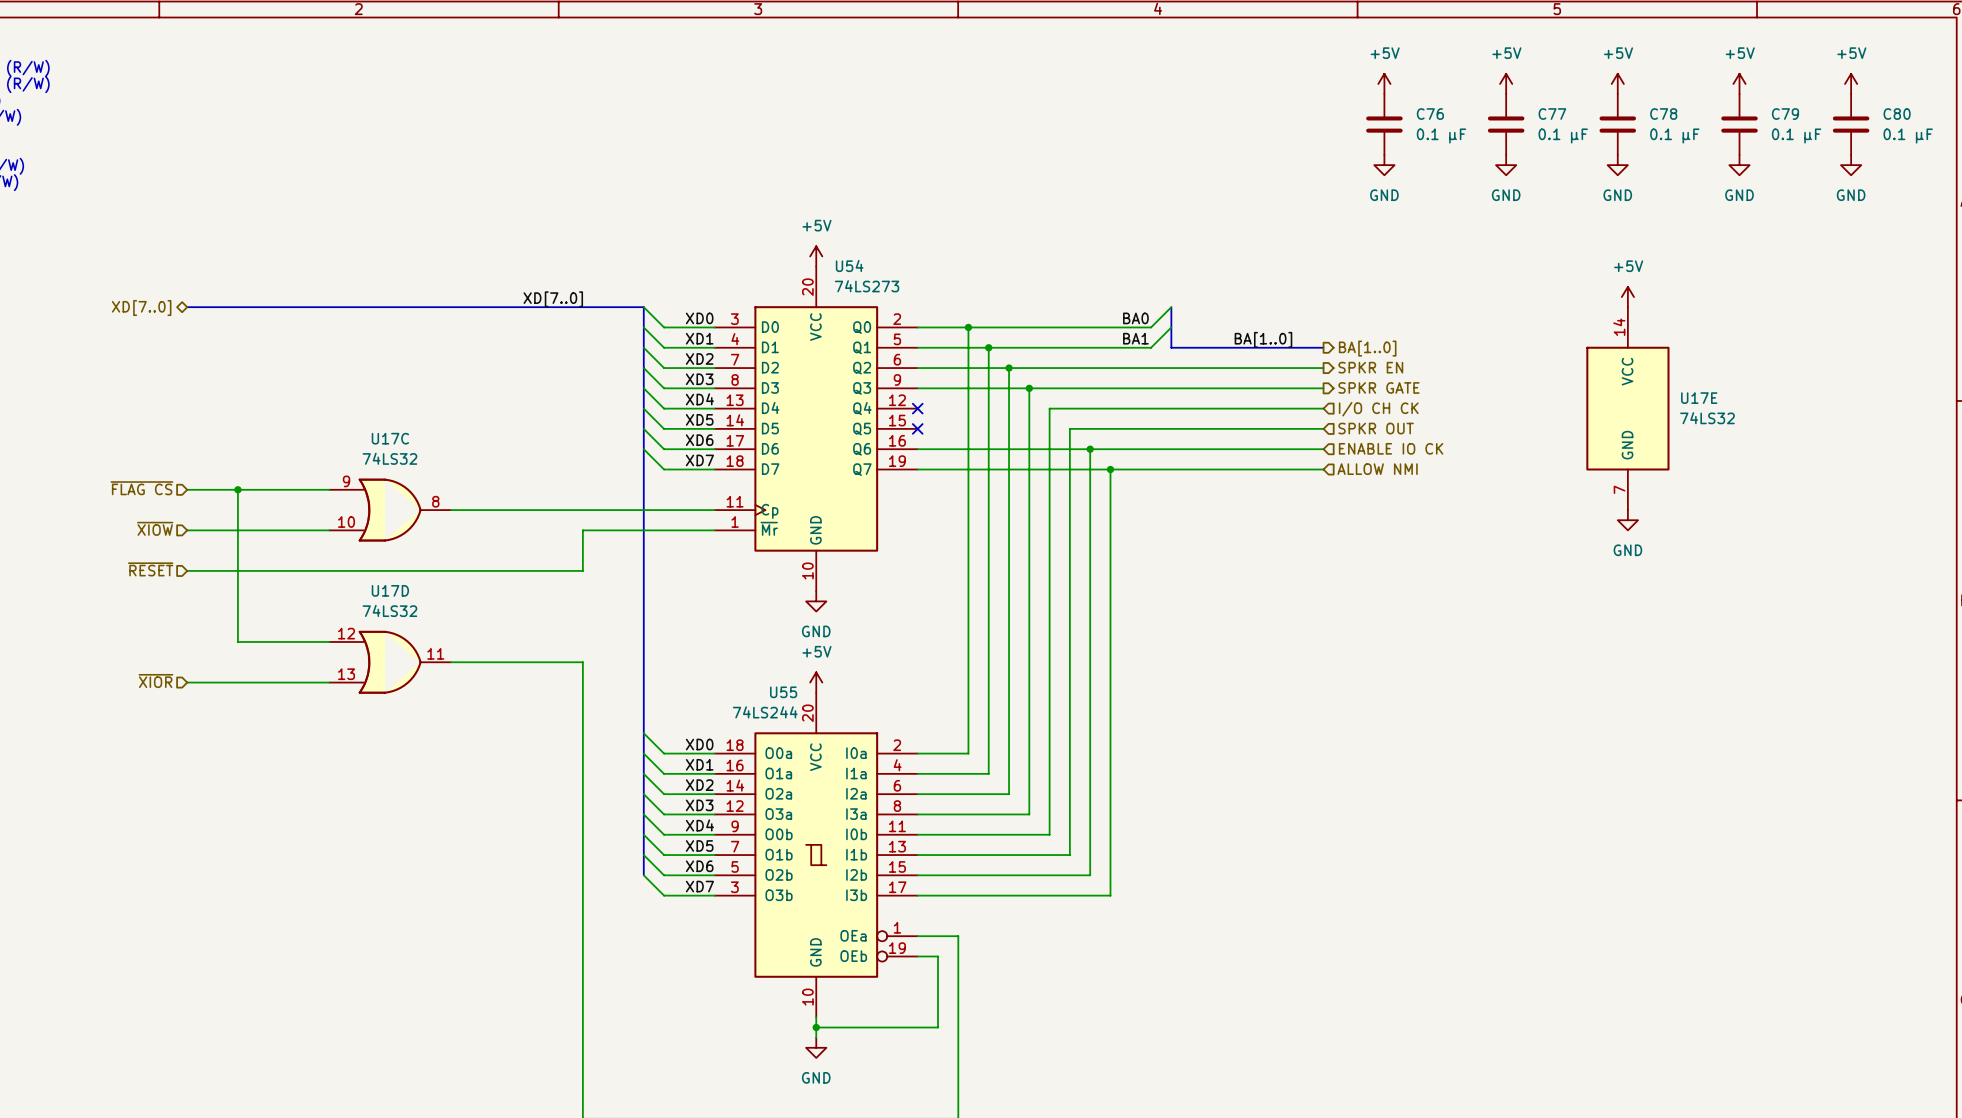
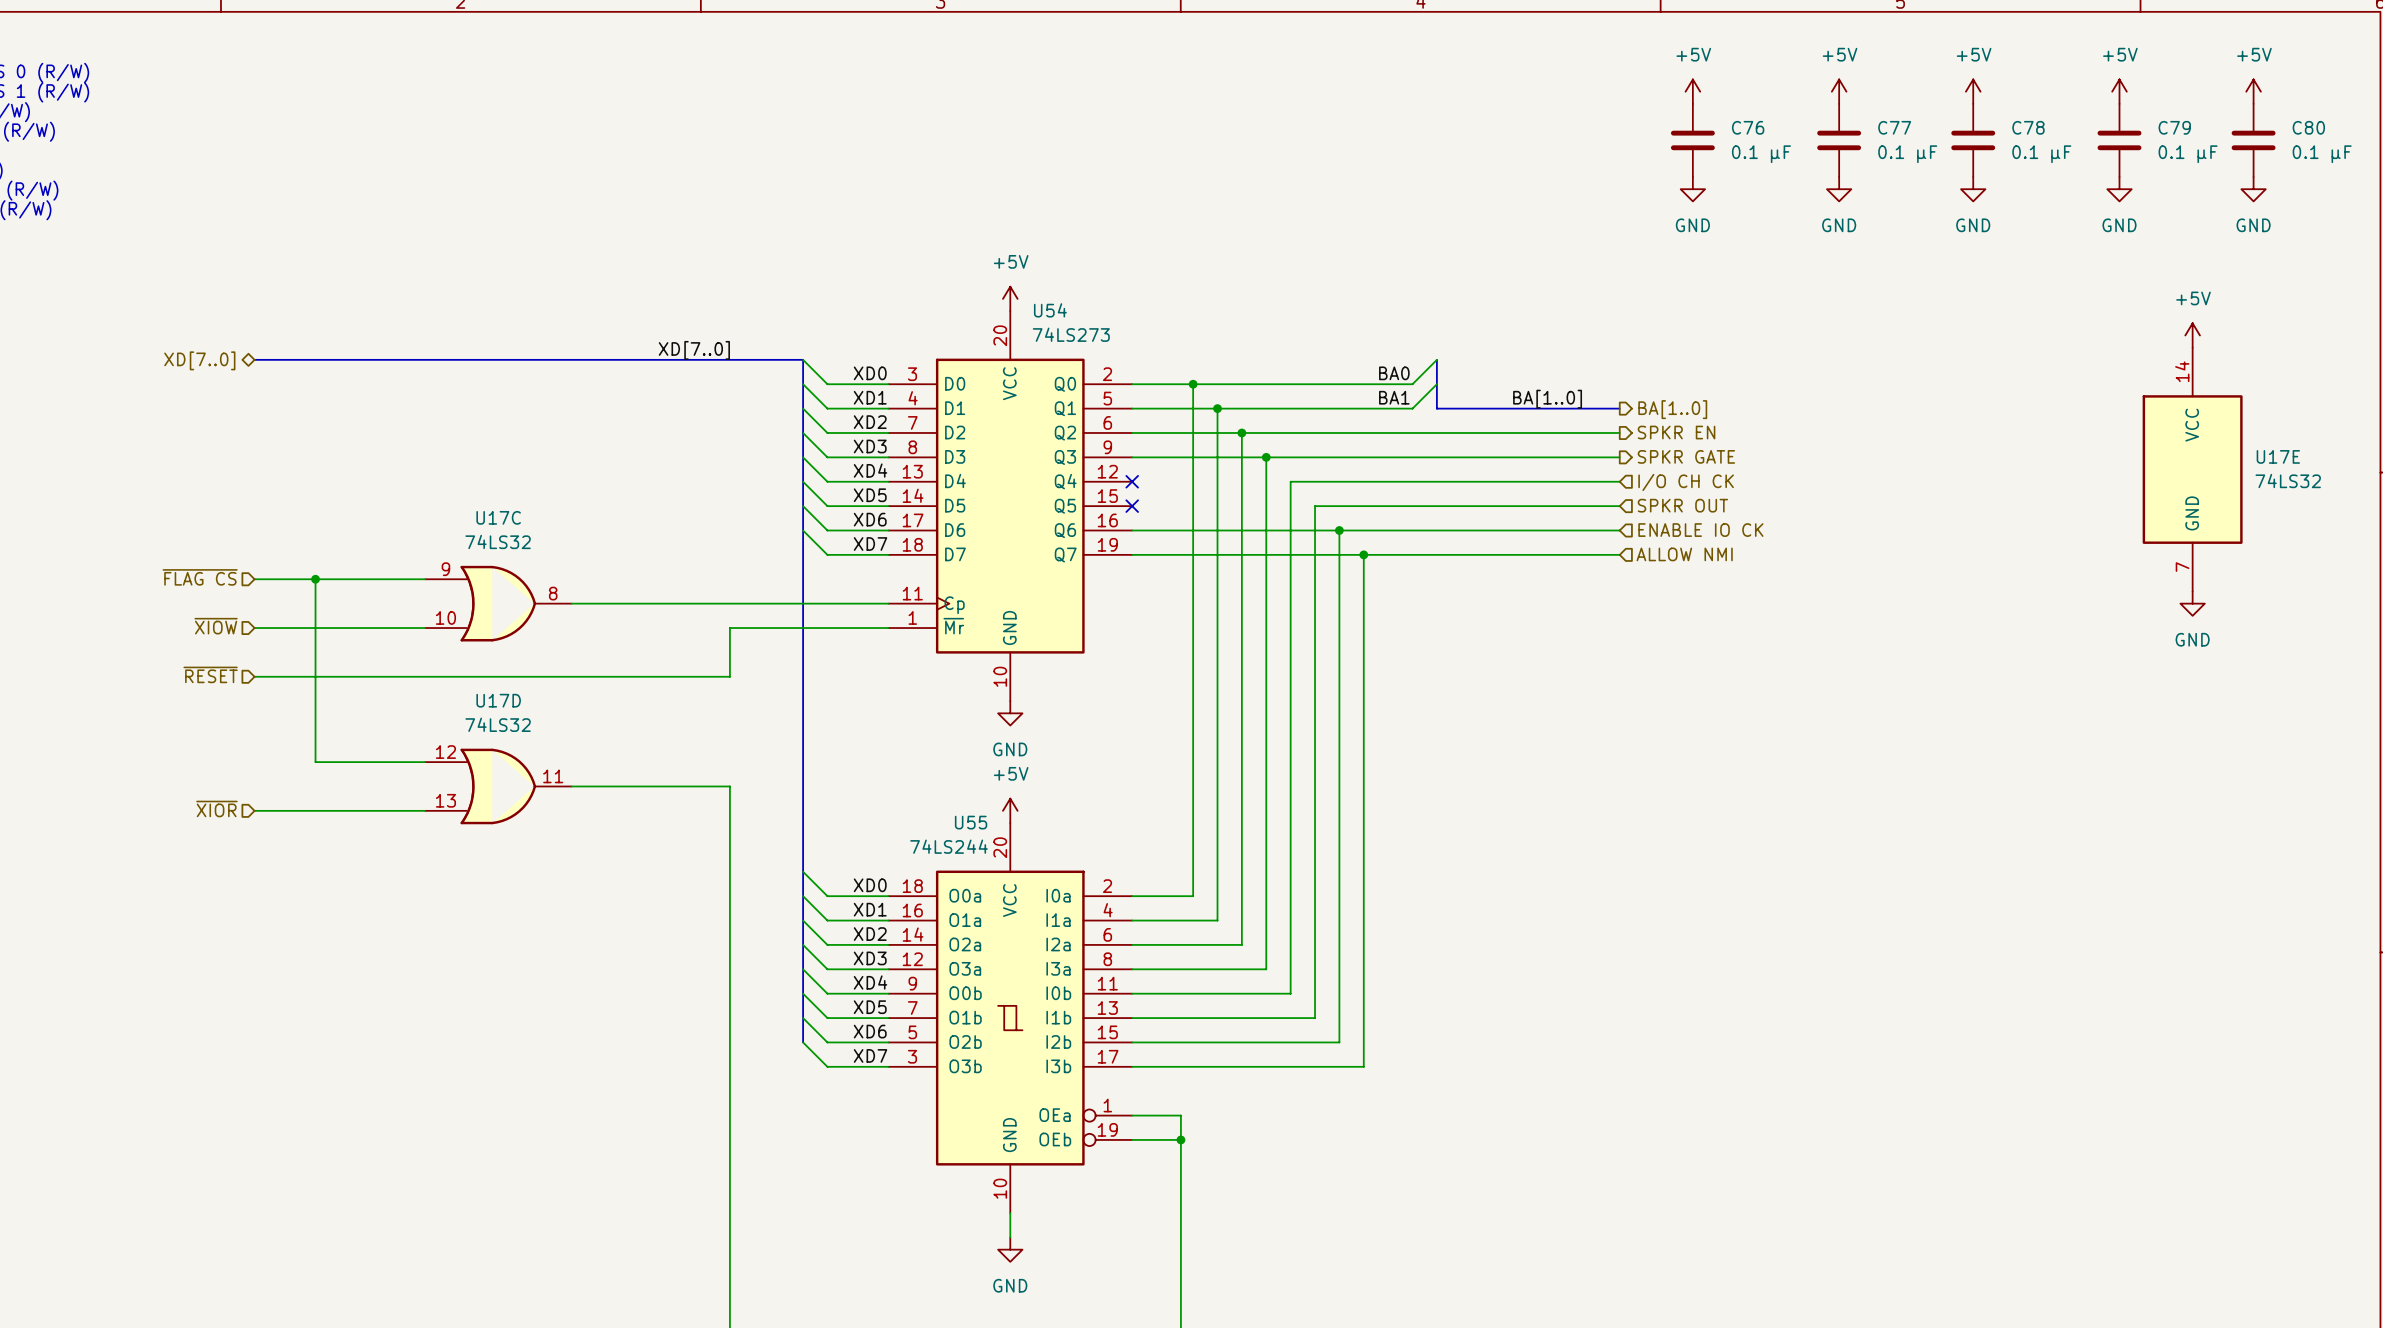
power symbol position: +5V (1627, 297) -> +5V (2192, 335)
U17E position: (1627, 408) -> (2192, 469)
power symbol position: GND (1627, 520) -> GND (2192, 603)
wire: (938, 956) (938, 1027) (816, 1027) -> (1156, 1139) (1180, 1139)
junction: none -> (1180, 1139)
junction: (816, 1027) -> none

